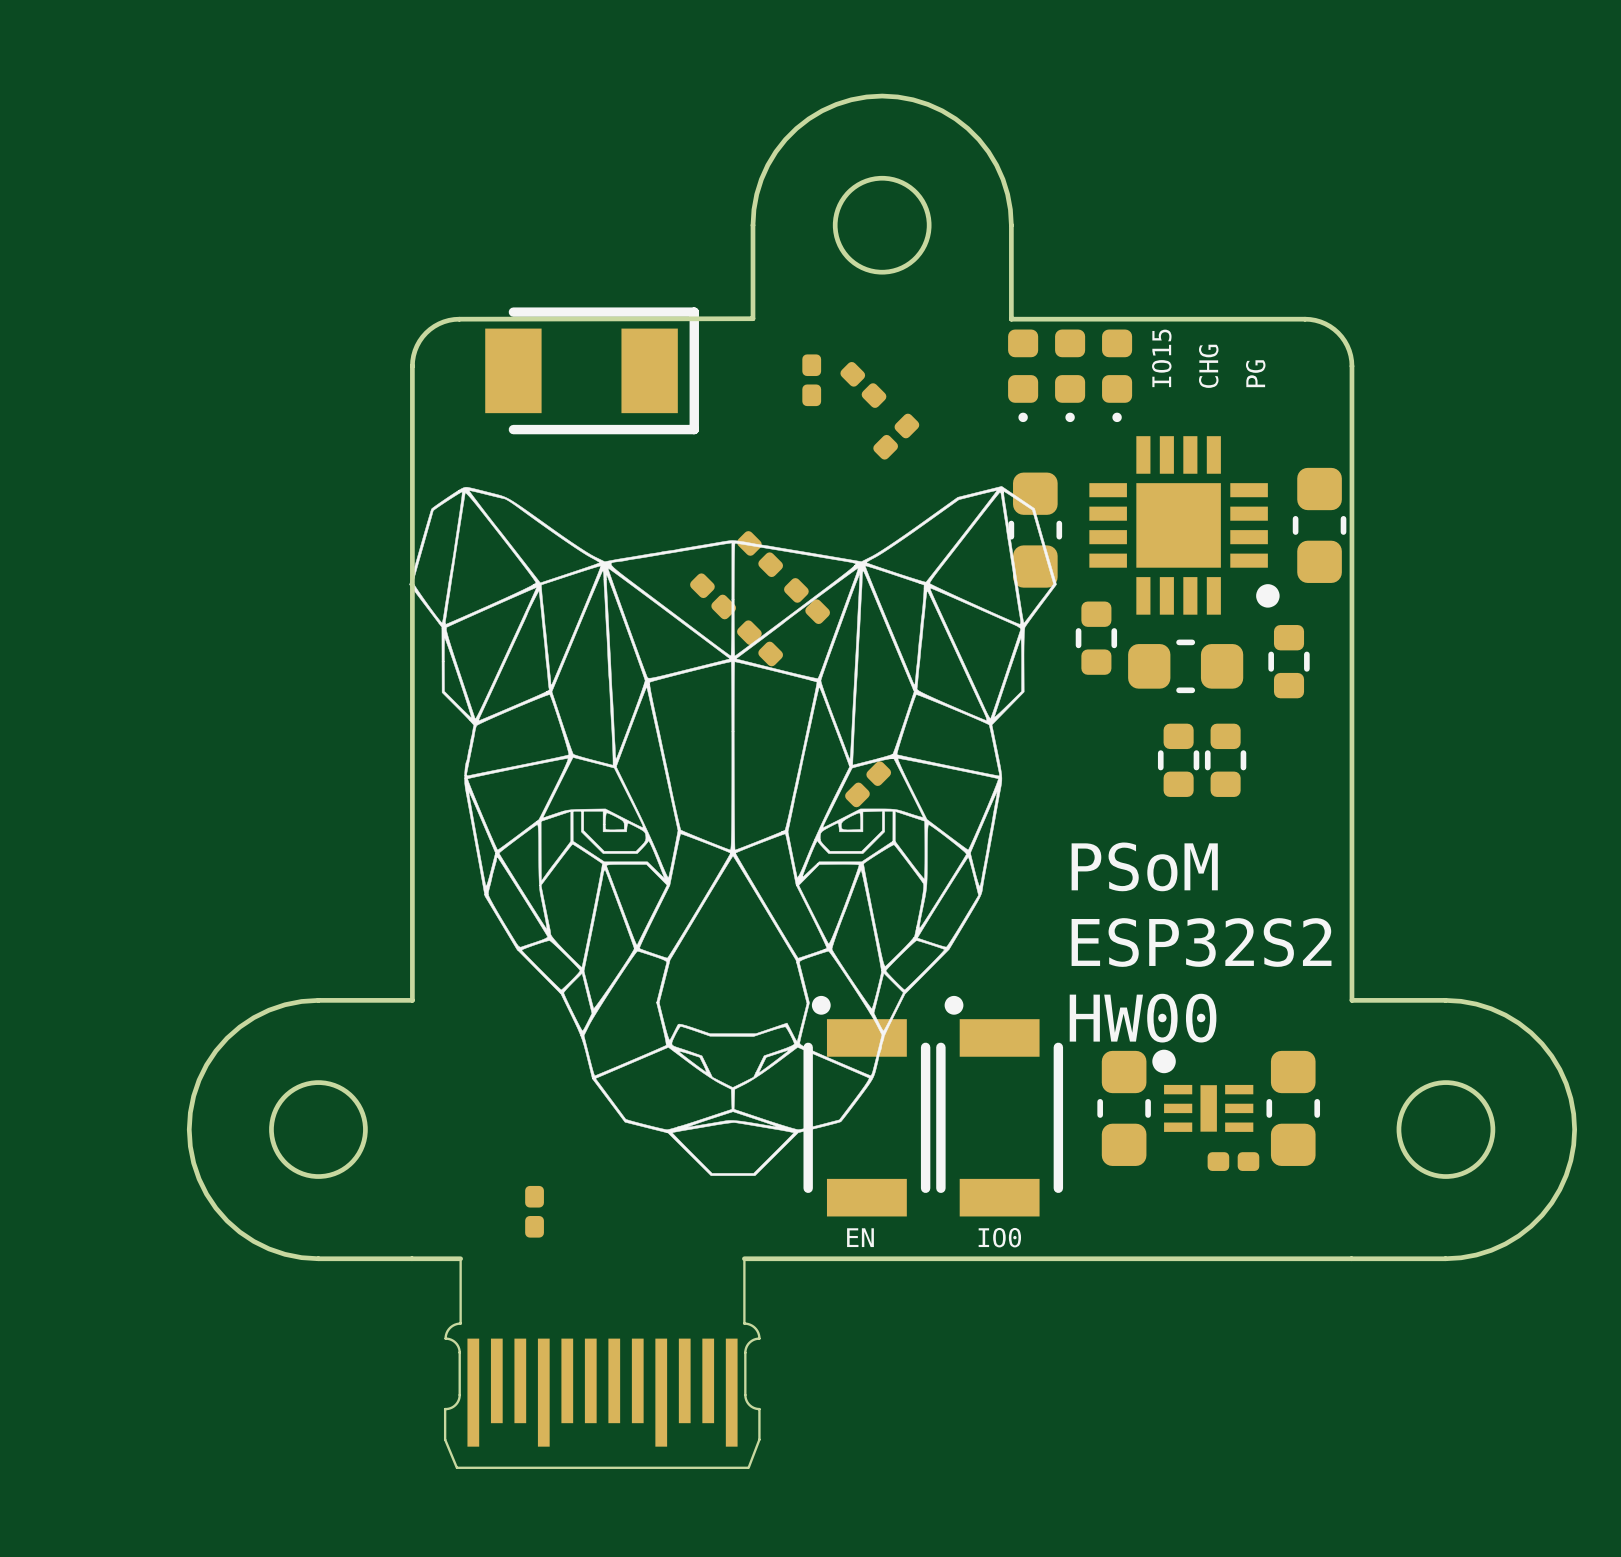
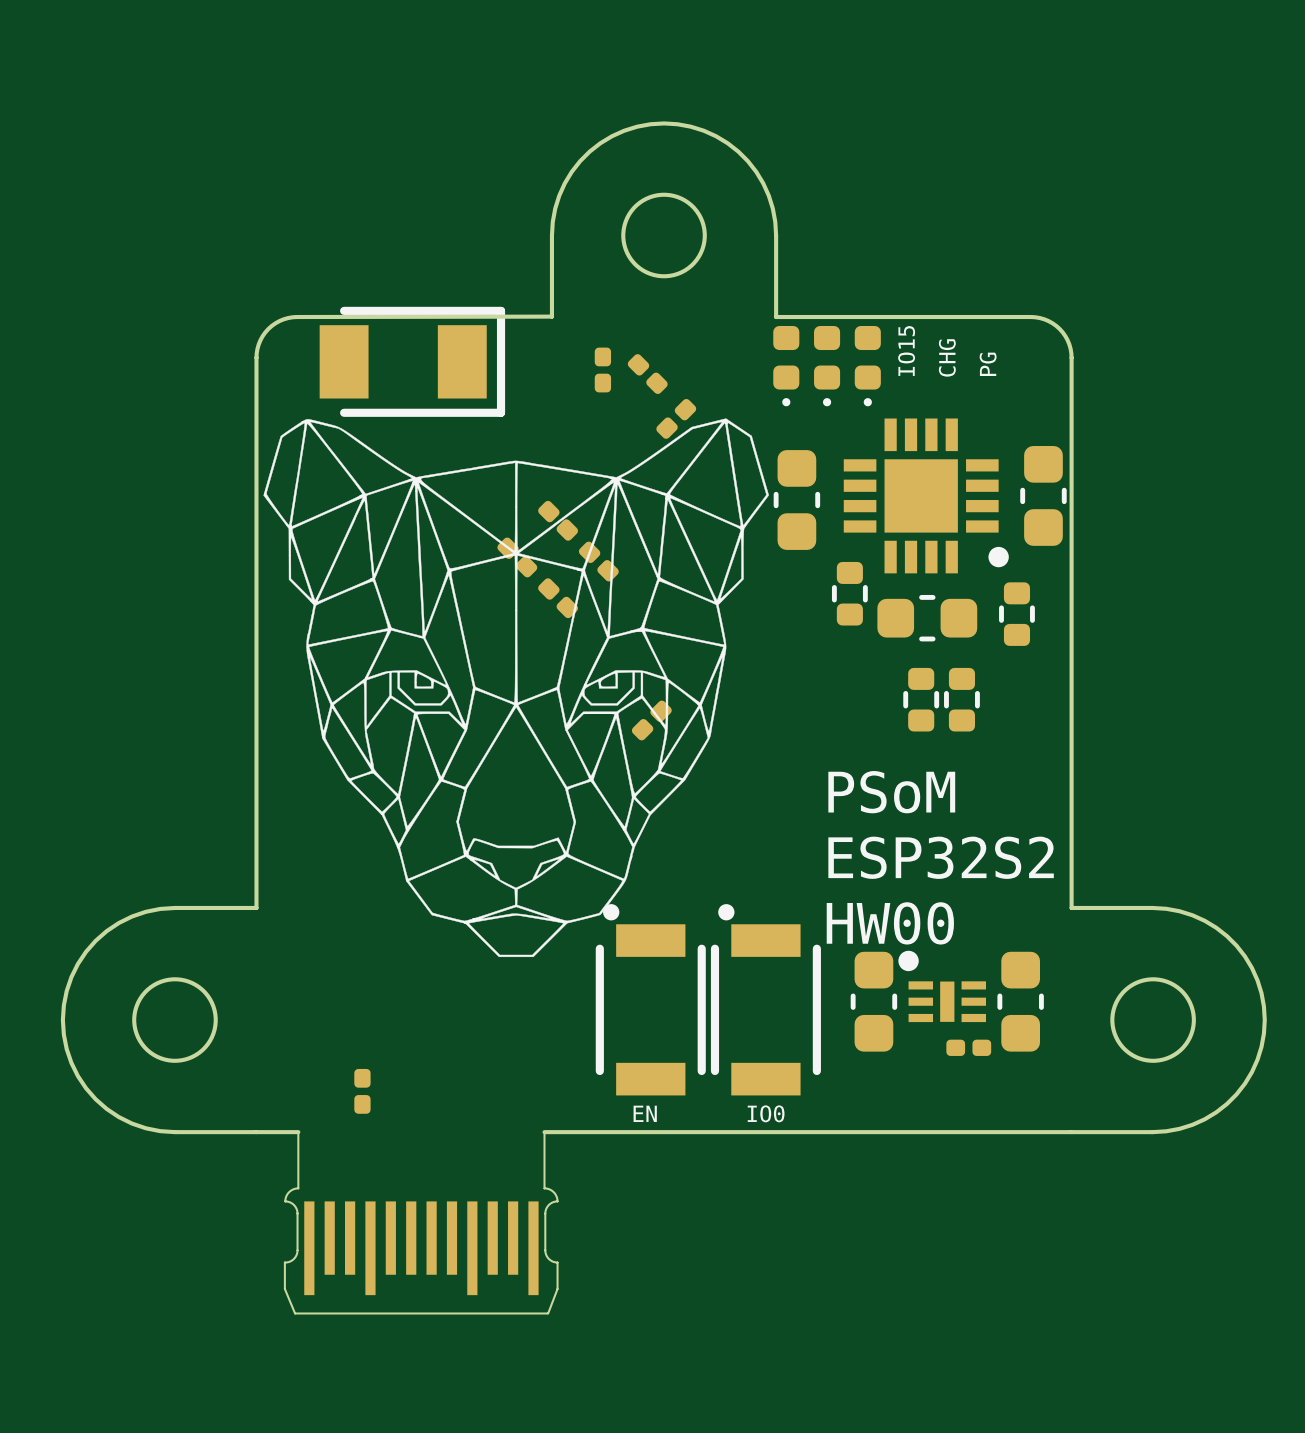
drawing: none -> [263, 418, 769, 958]
drawing: [409, 486, 1057, 1176] -> none

